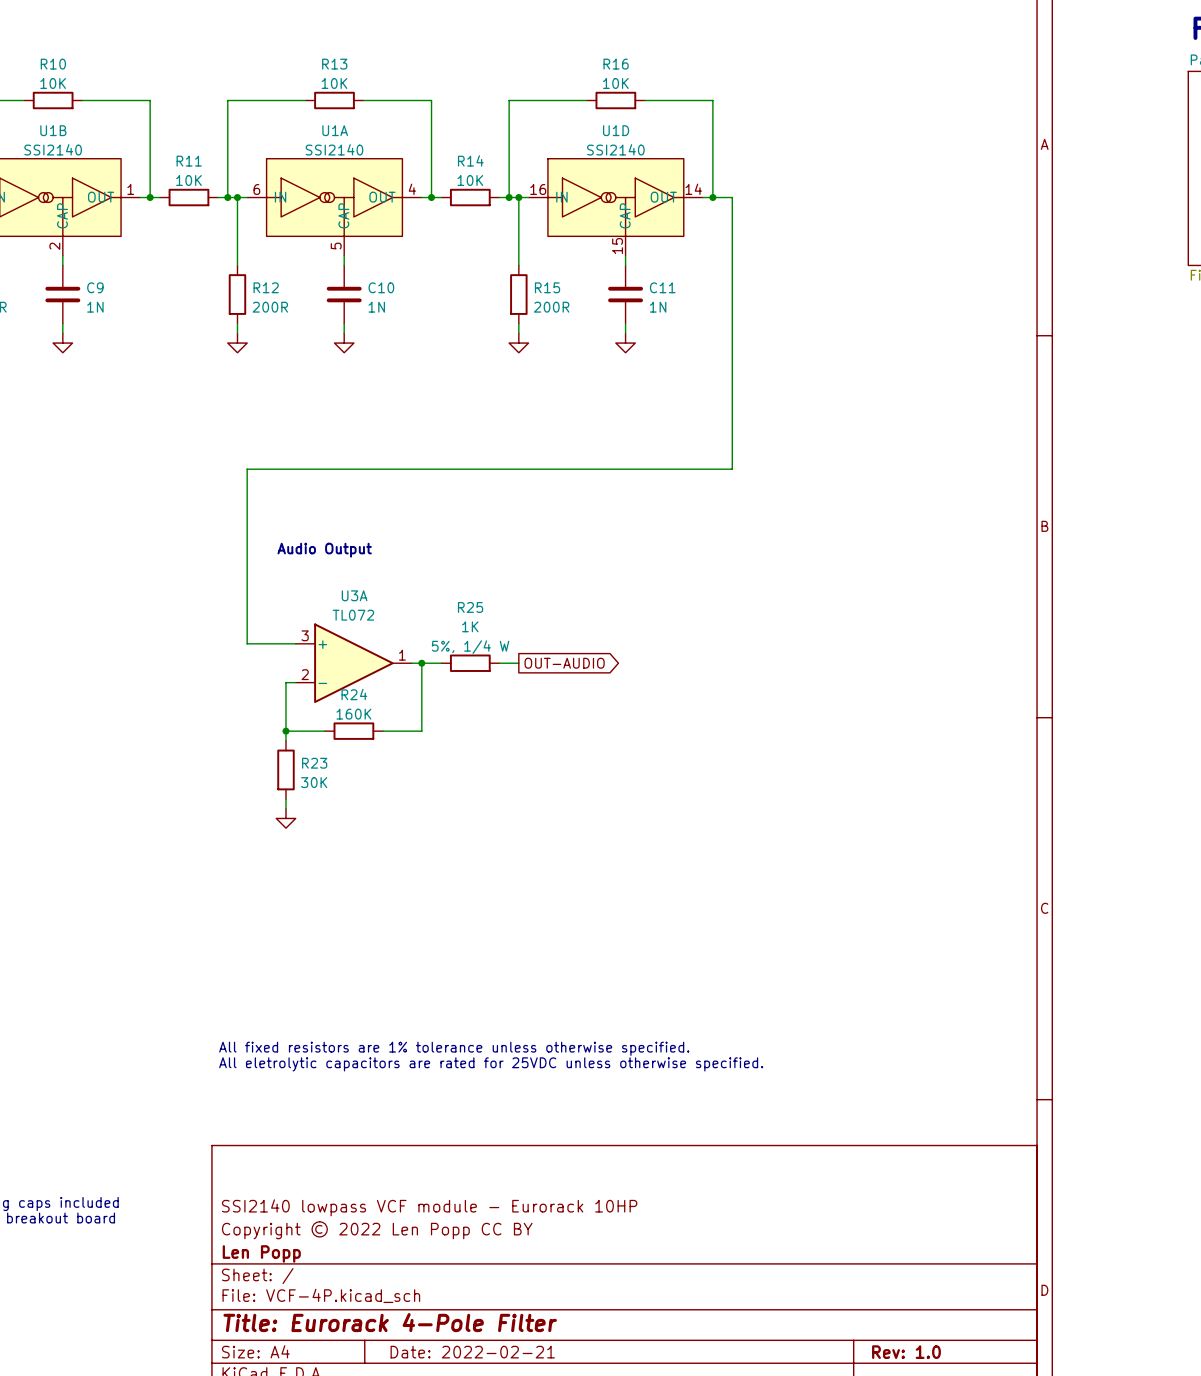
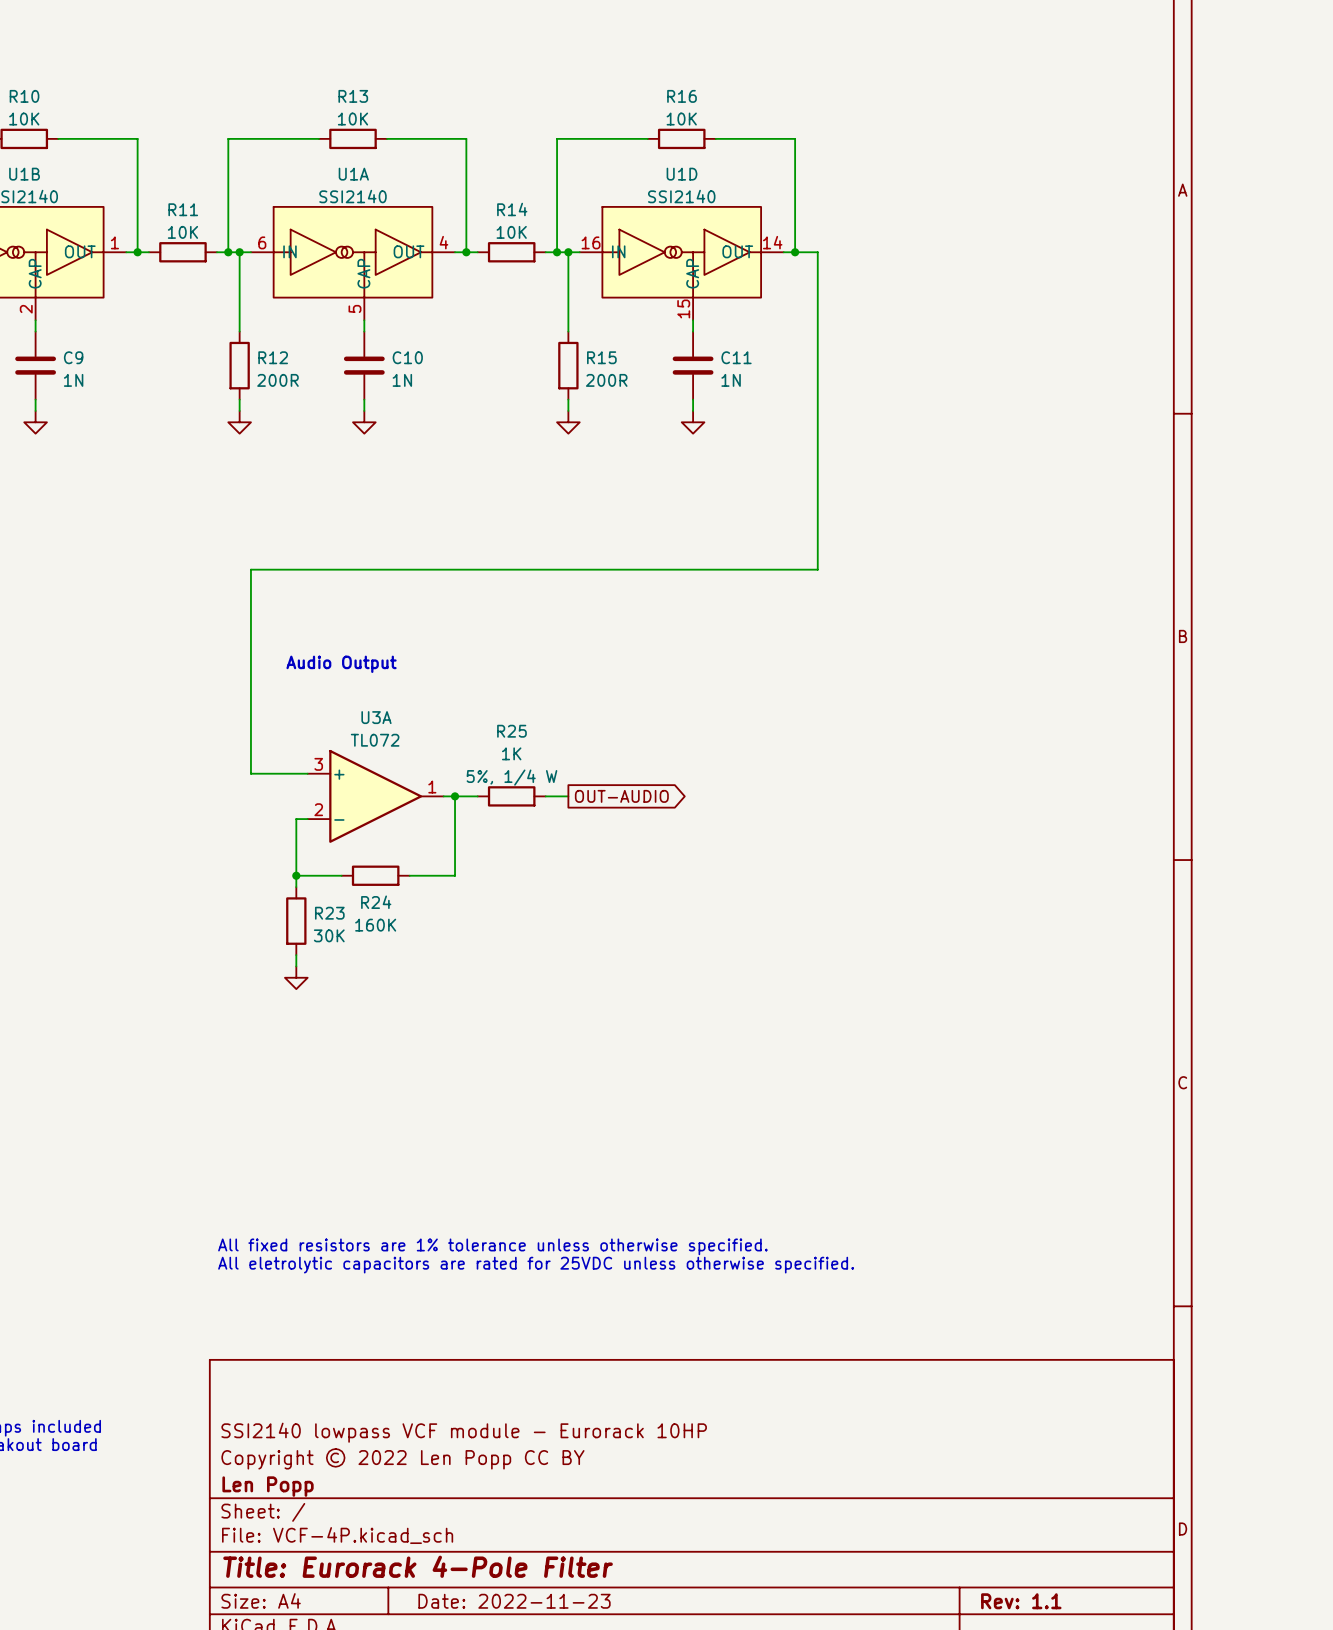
R24 name position: R24 (354, 694) -> R24 (376, 902)
R24 value position: 160K (353, 714) -> 160K (375, 925)
title block: Date: 2022-02-21 (472, 1352) -> Date: 2022-11-23 (514, 1601)
title block: Rev: 1.0 (906, 1352) -> Rev: 1.1 (1021, 1601)

